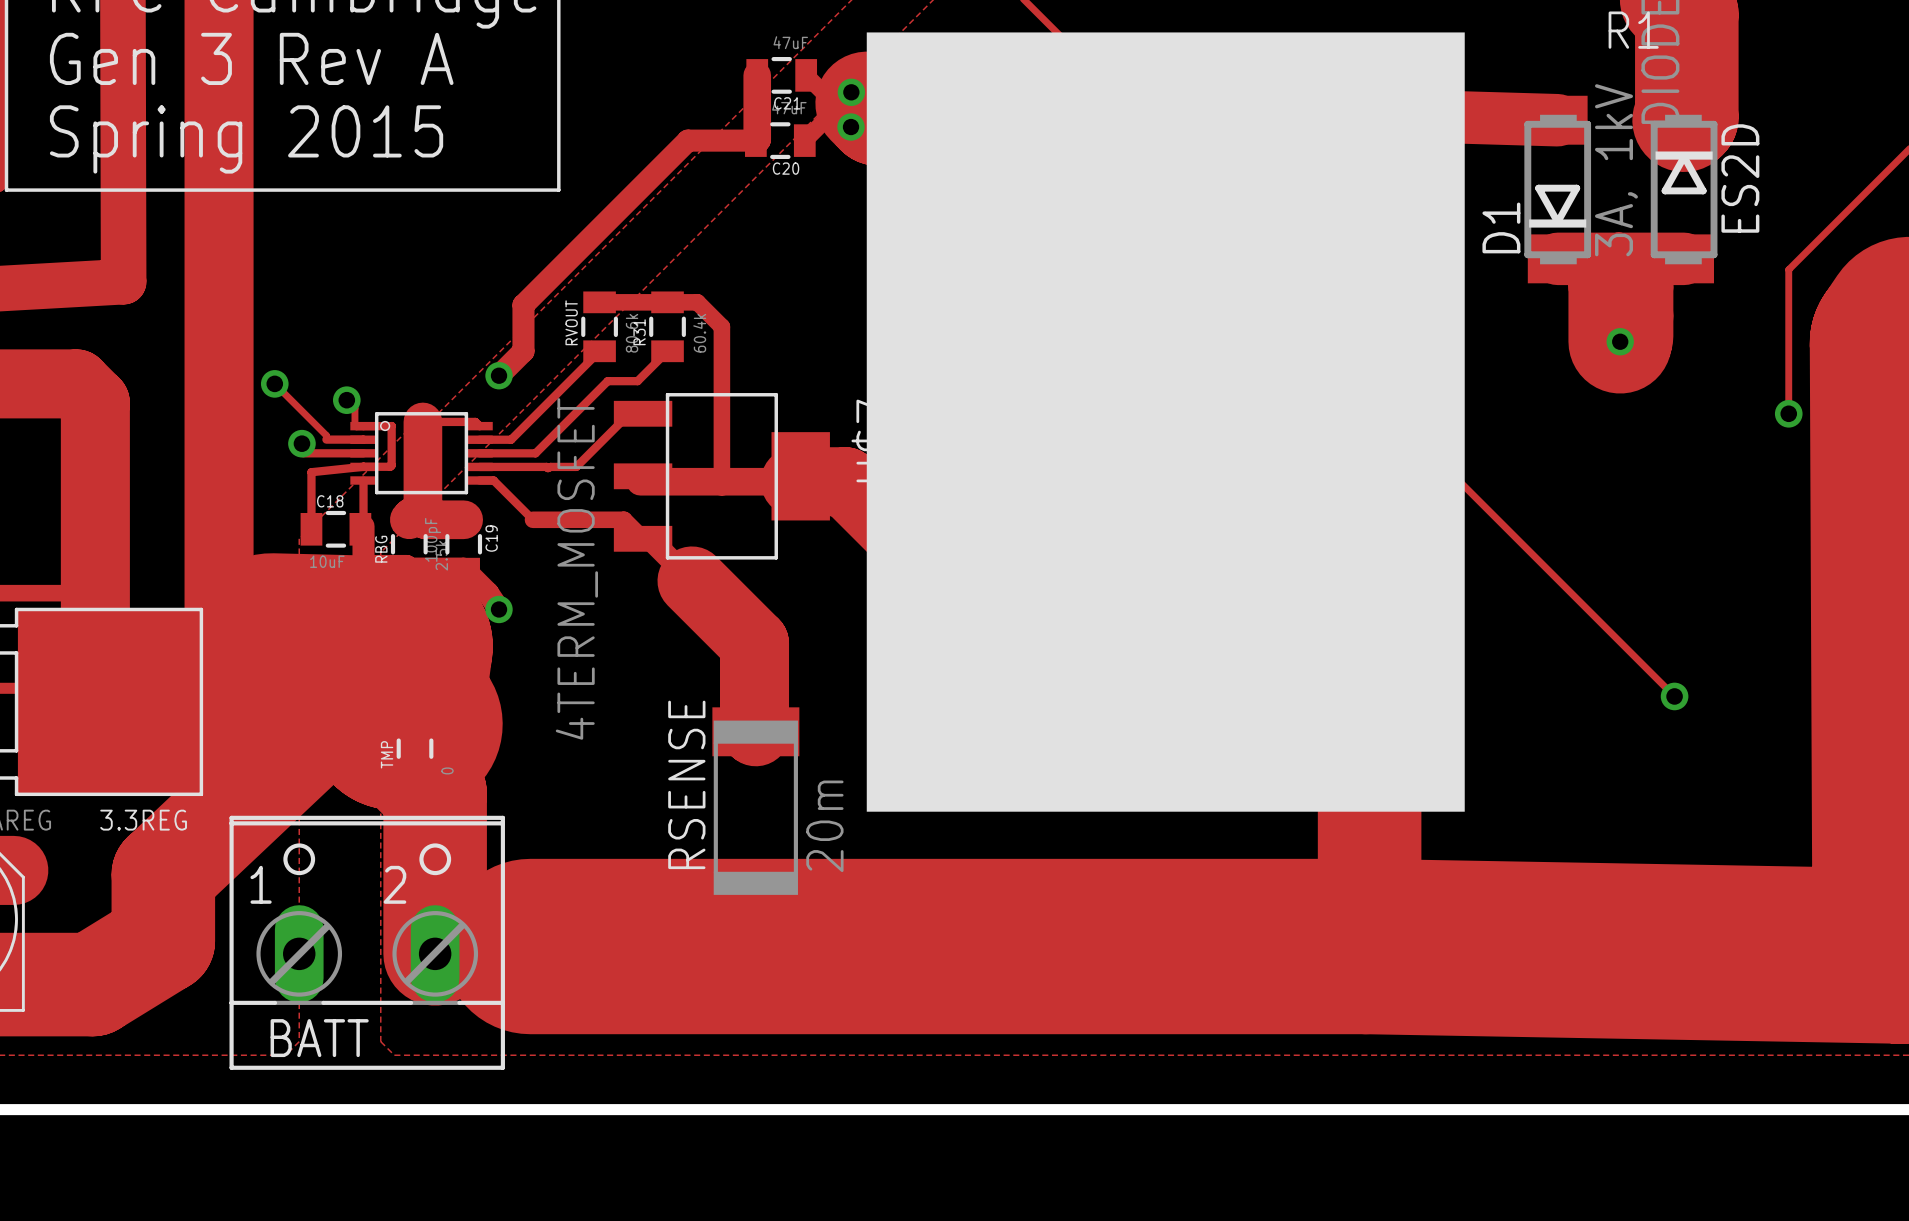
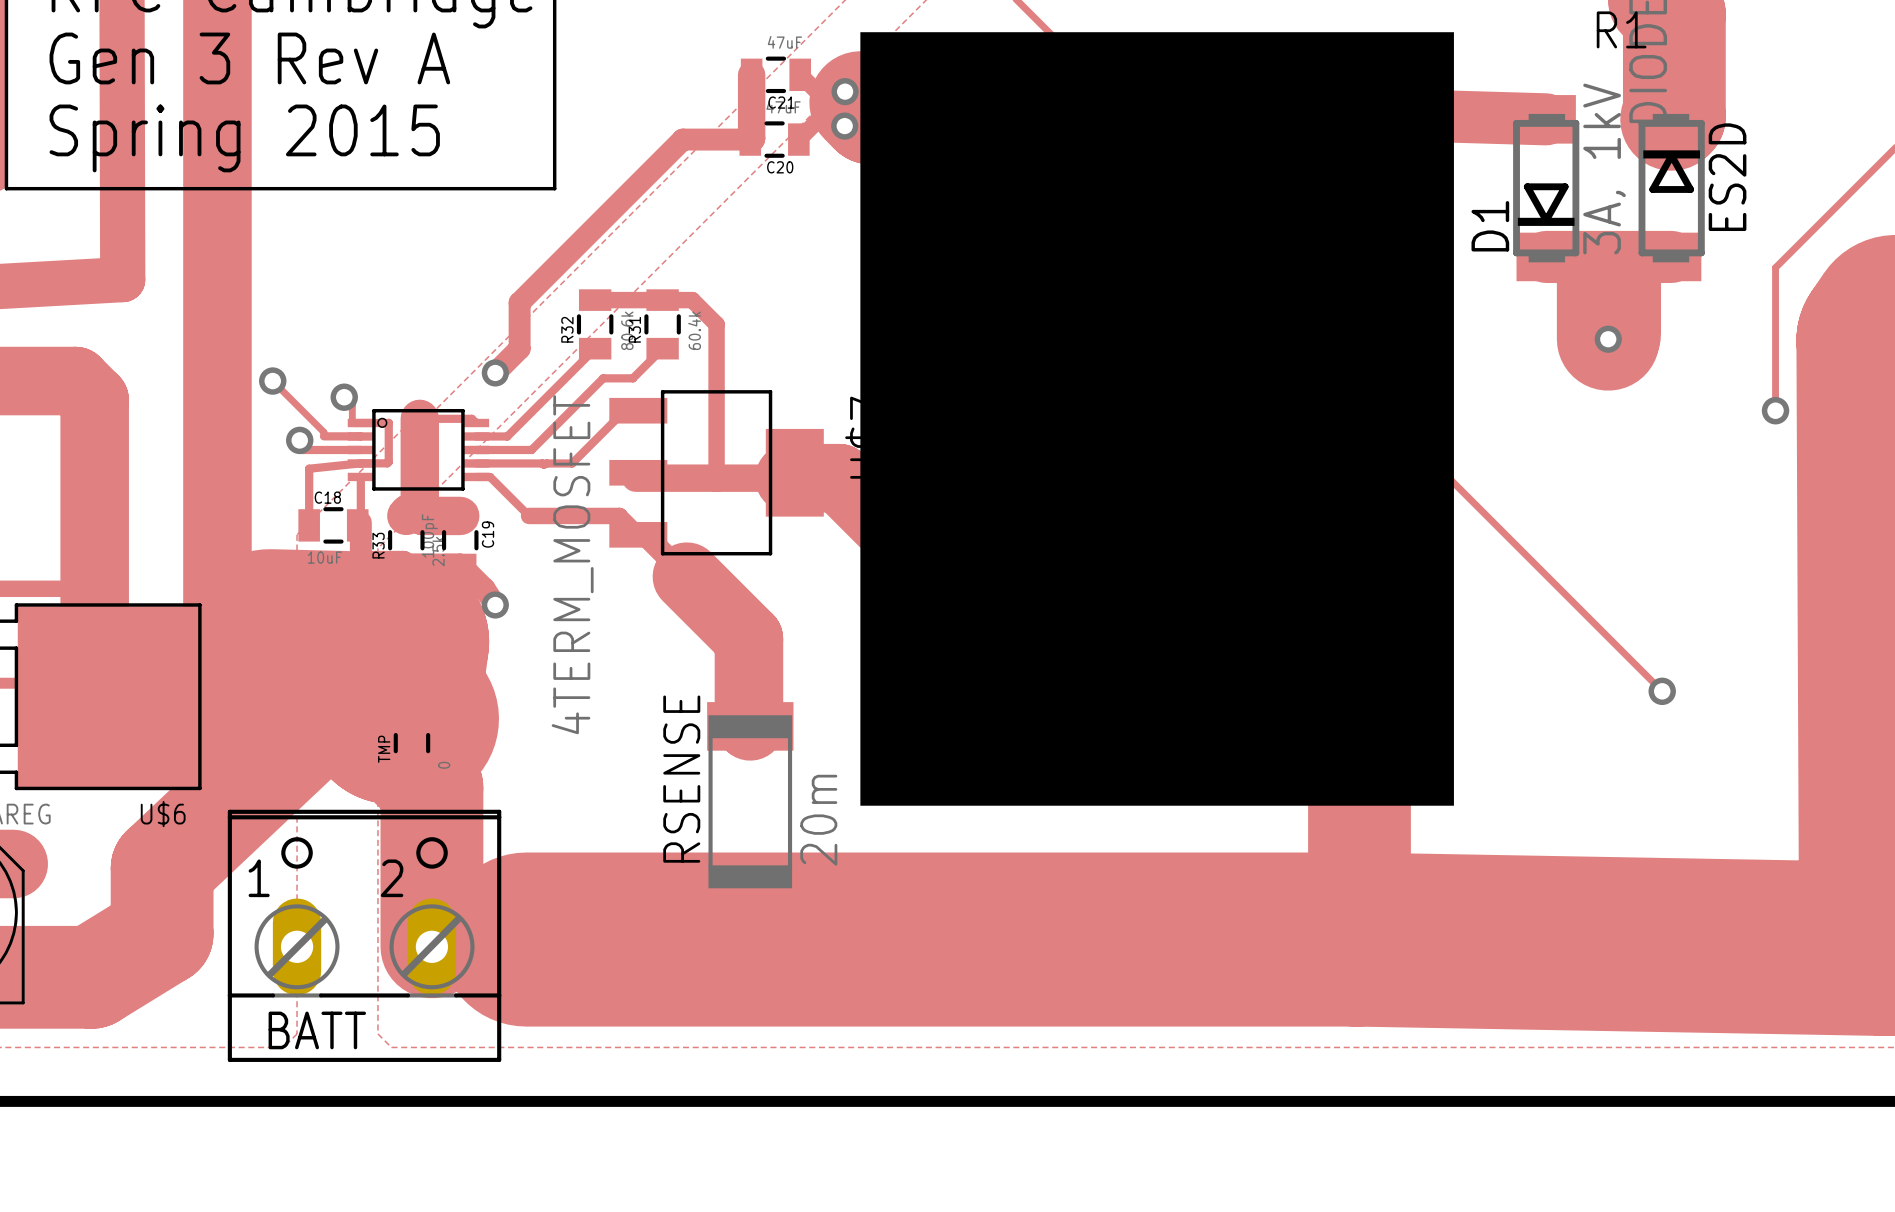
RVOUT name: RVOUT (571, 322) -> R32 (567, 329)
RBG name: RBG (381, 549) -> R33 (378, 545)
3.3REG name: 3.3REG (143, 820) -> U$6 (163, 814)

